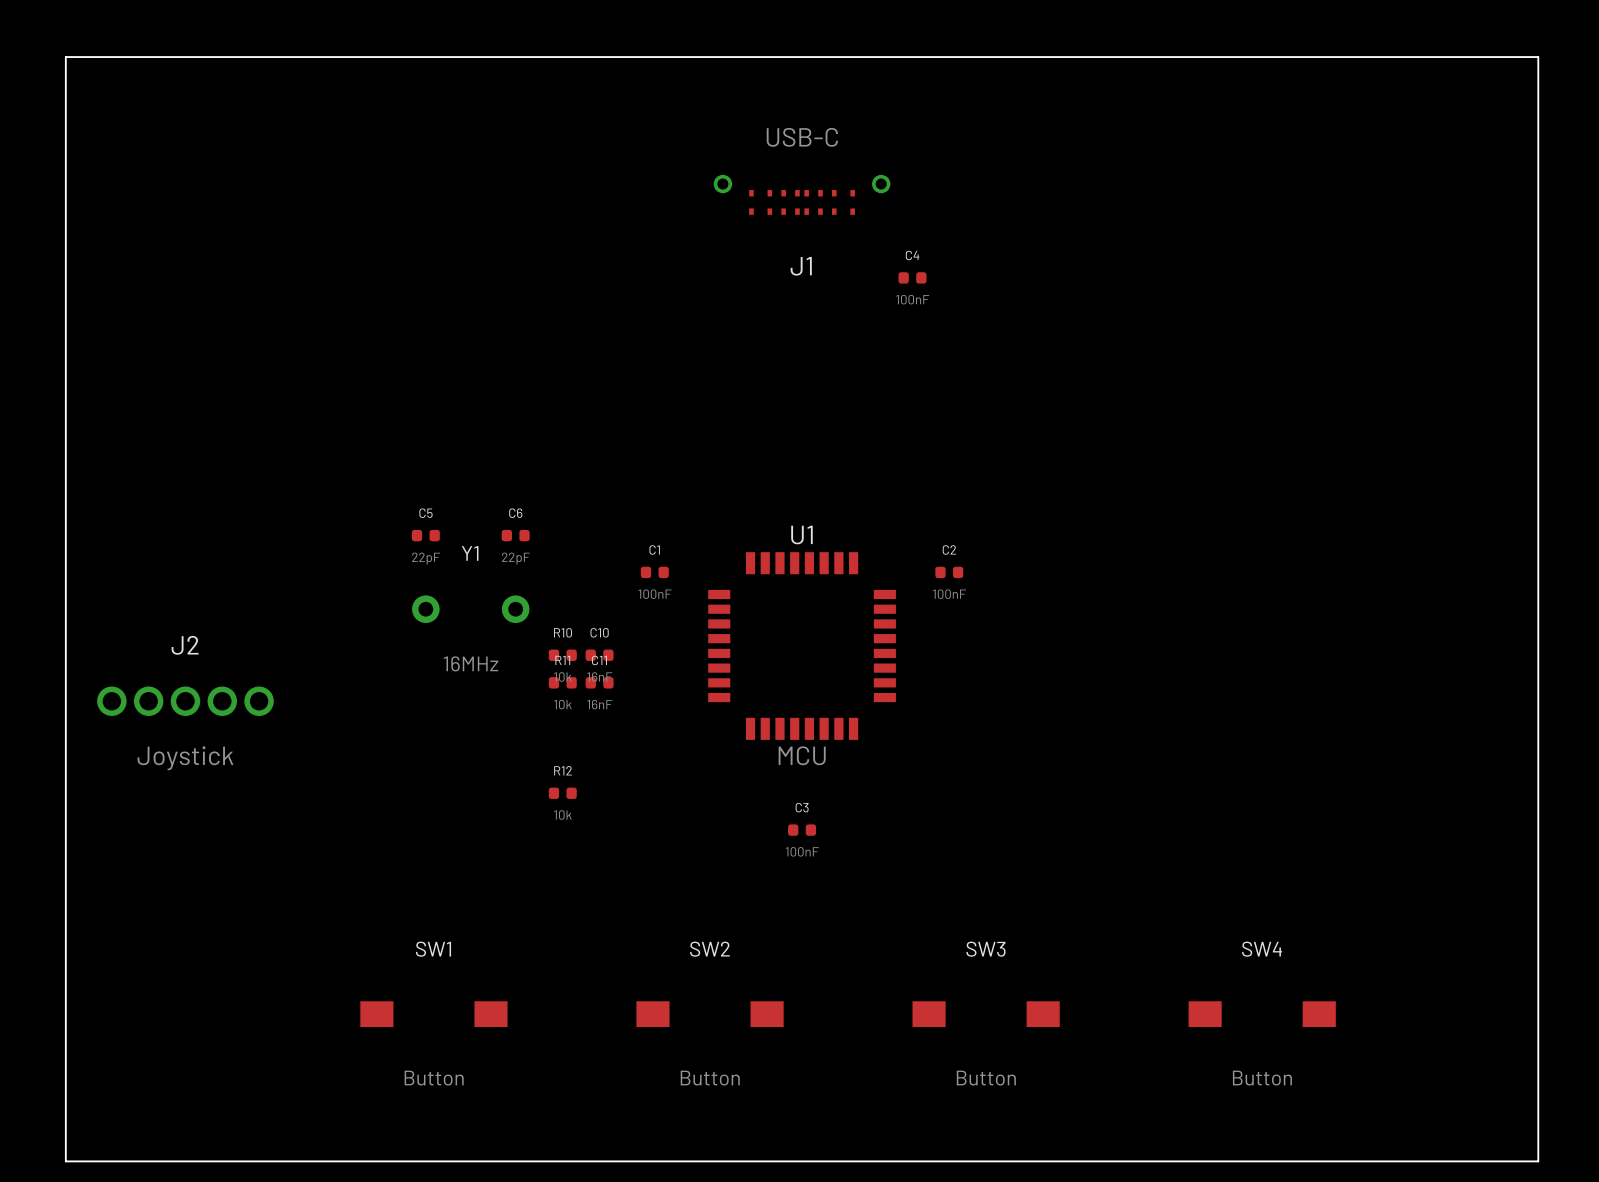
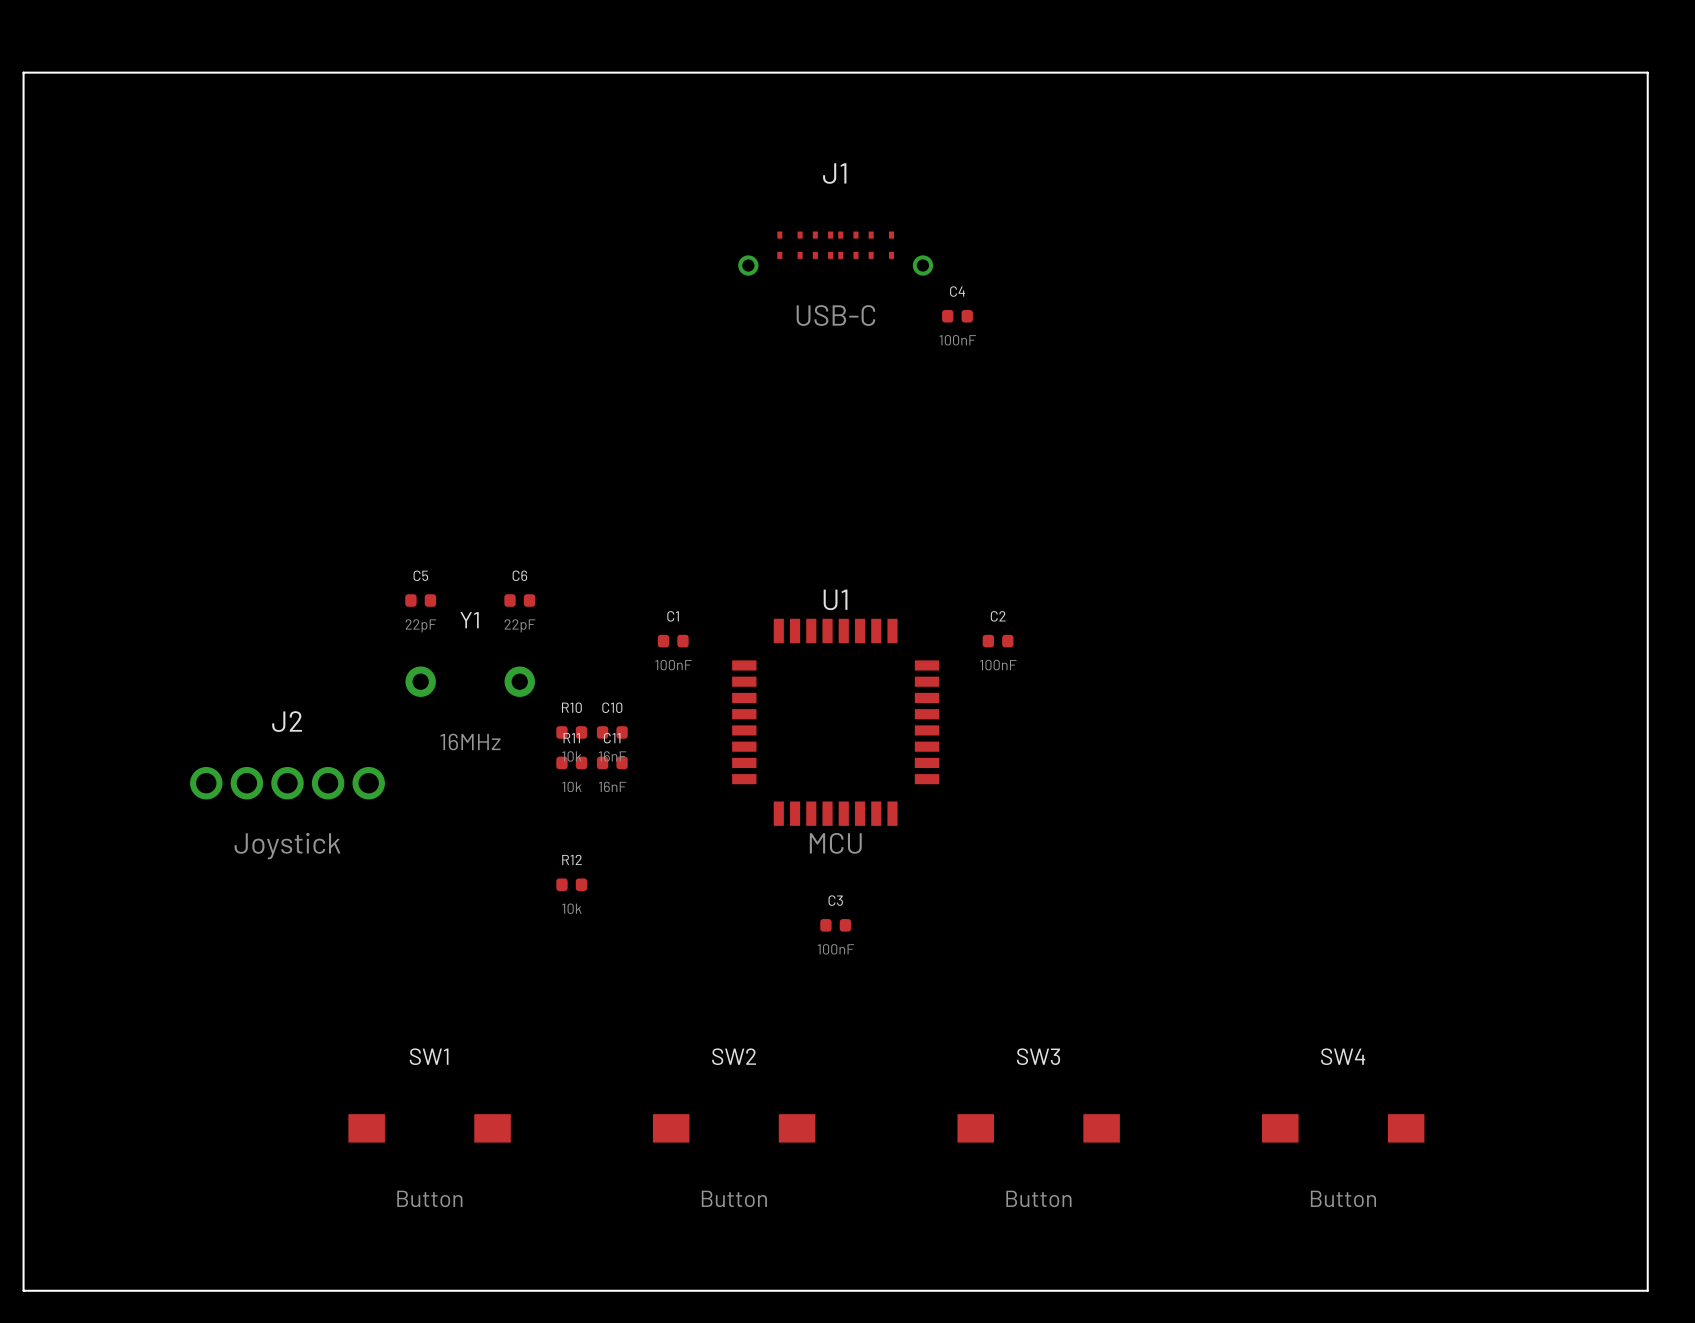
J1 rotation: 0° (802, 194) -> 180° (835, 253)
J2 position: (185, 701) -> (287, 783)

